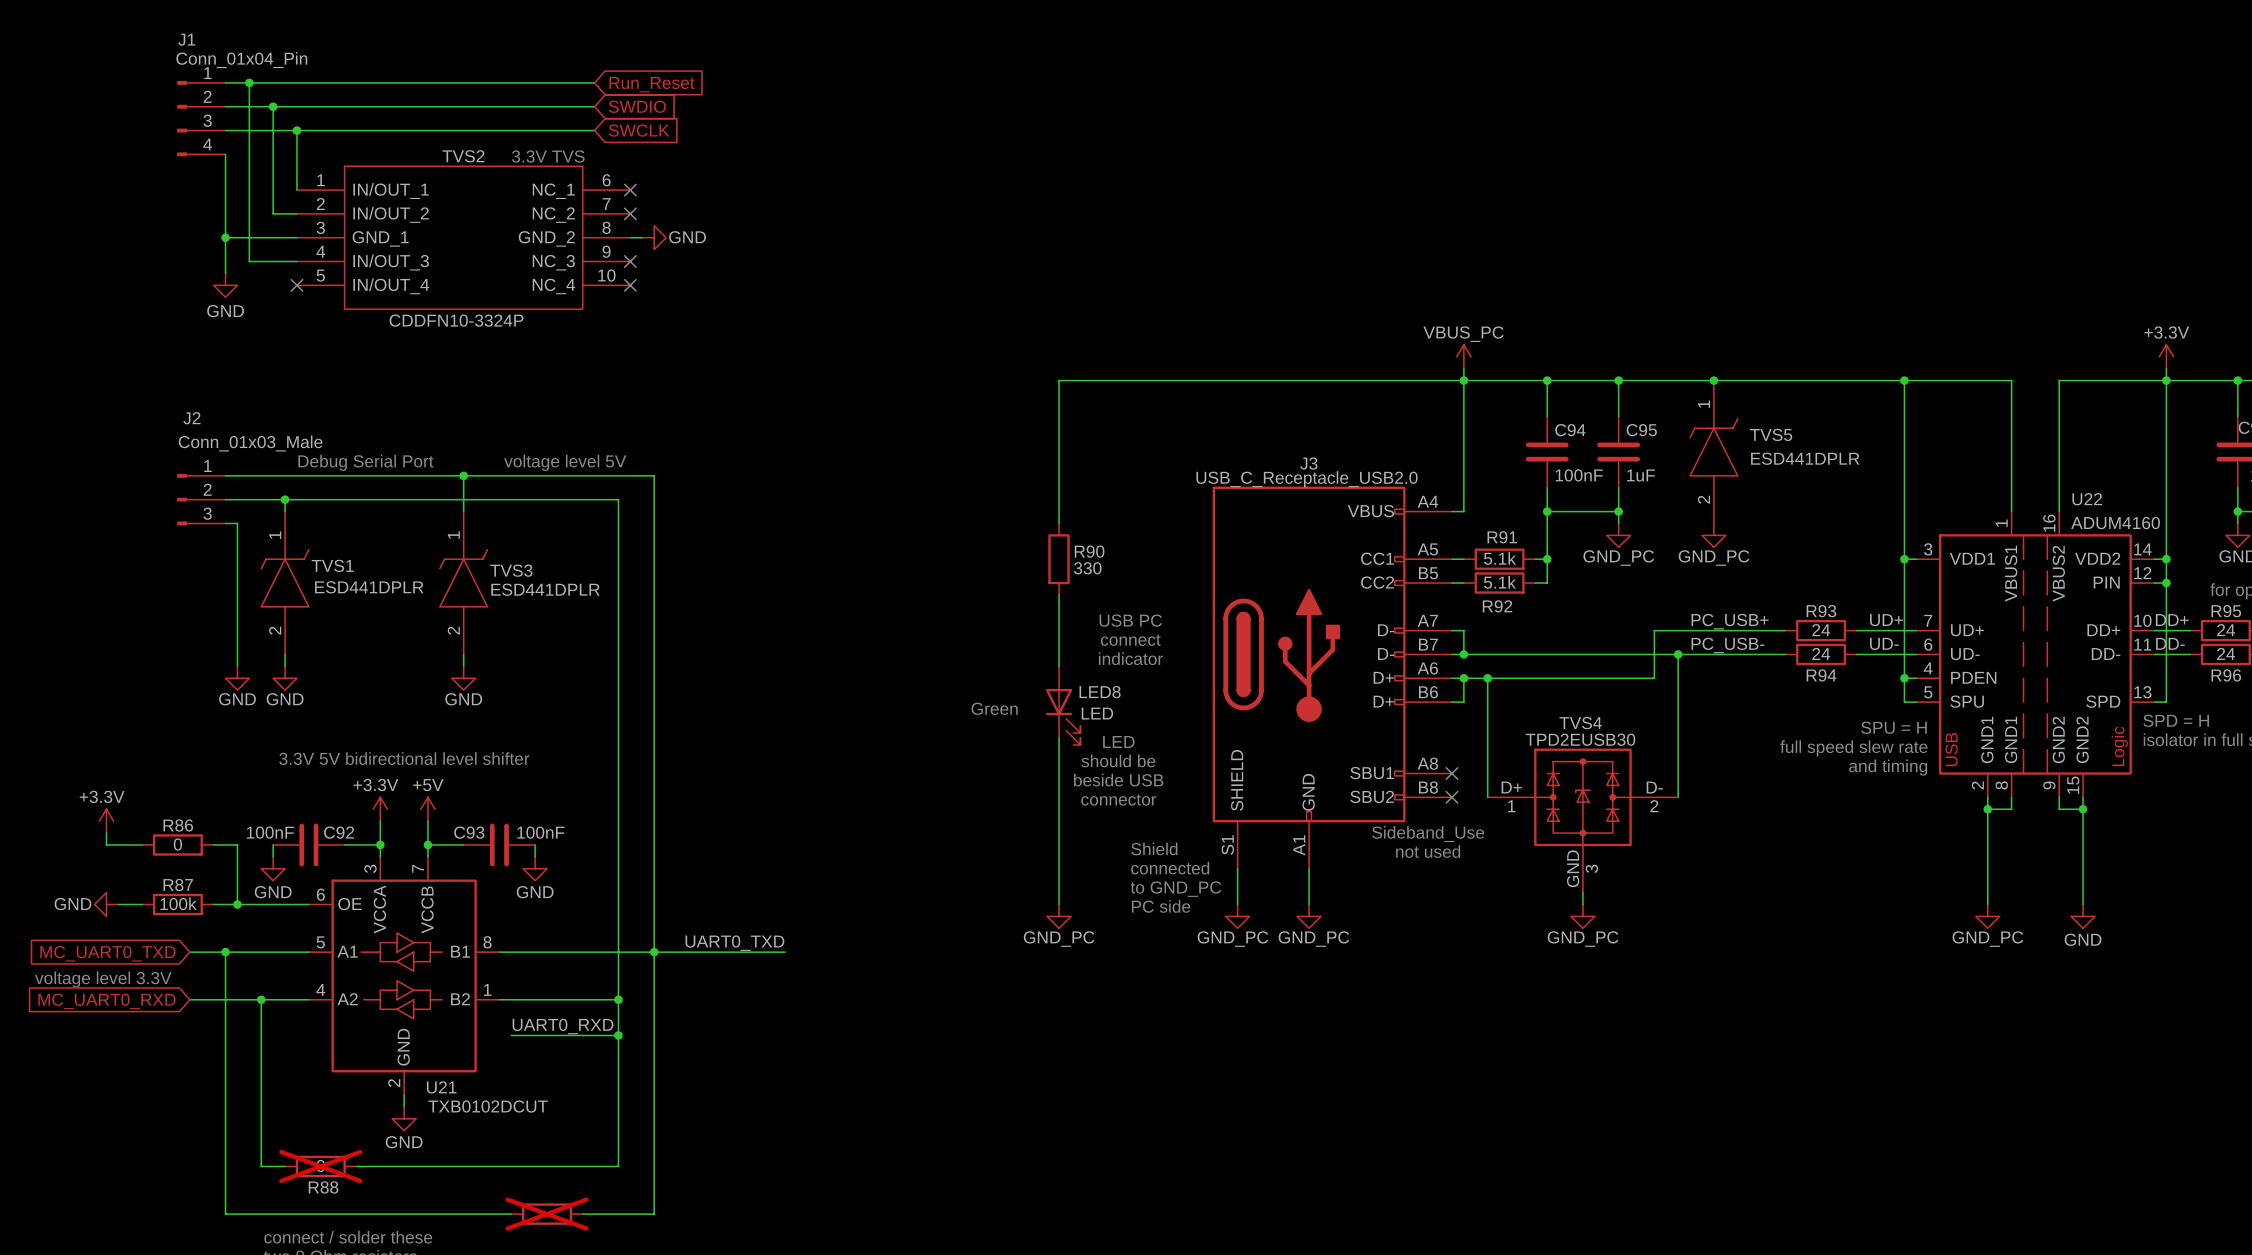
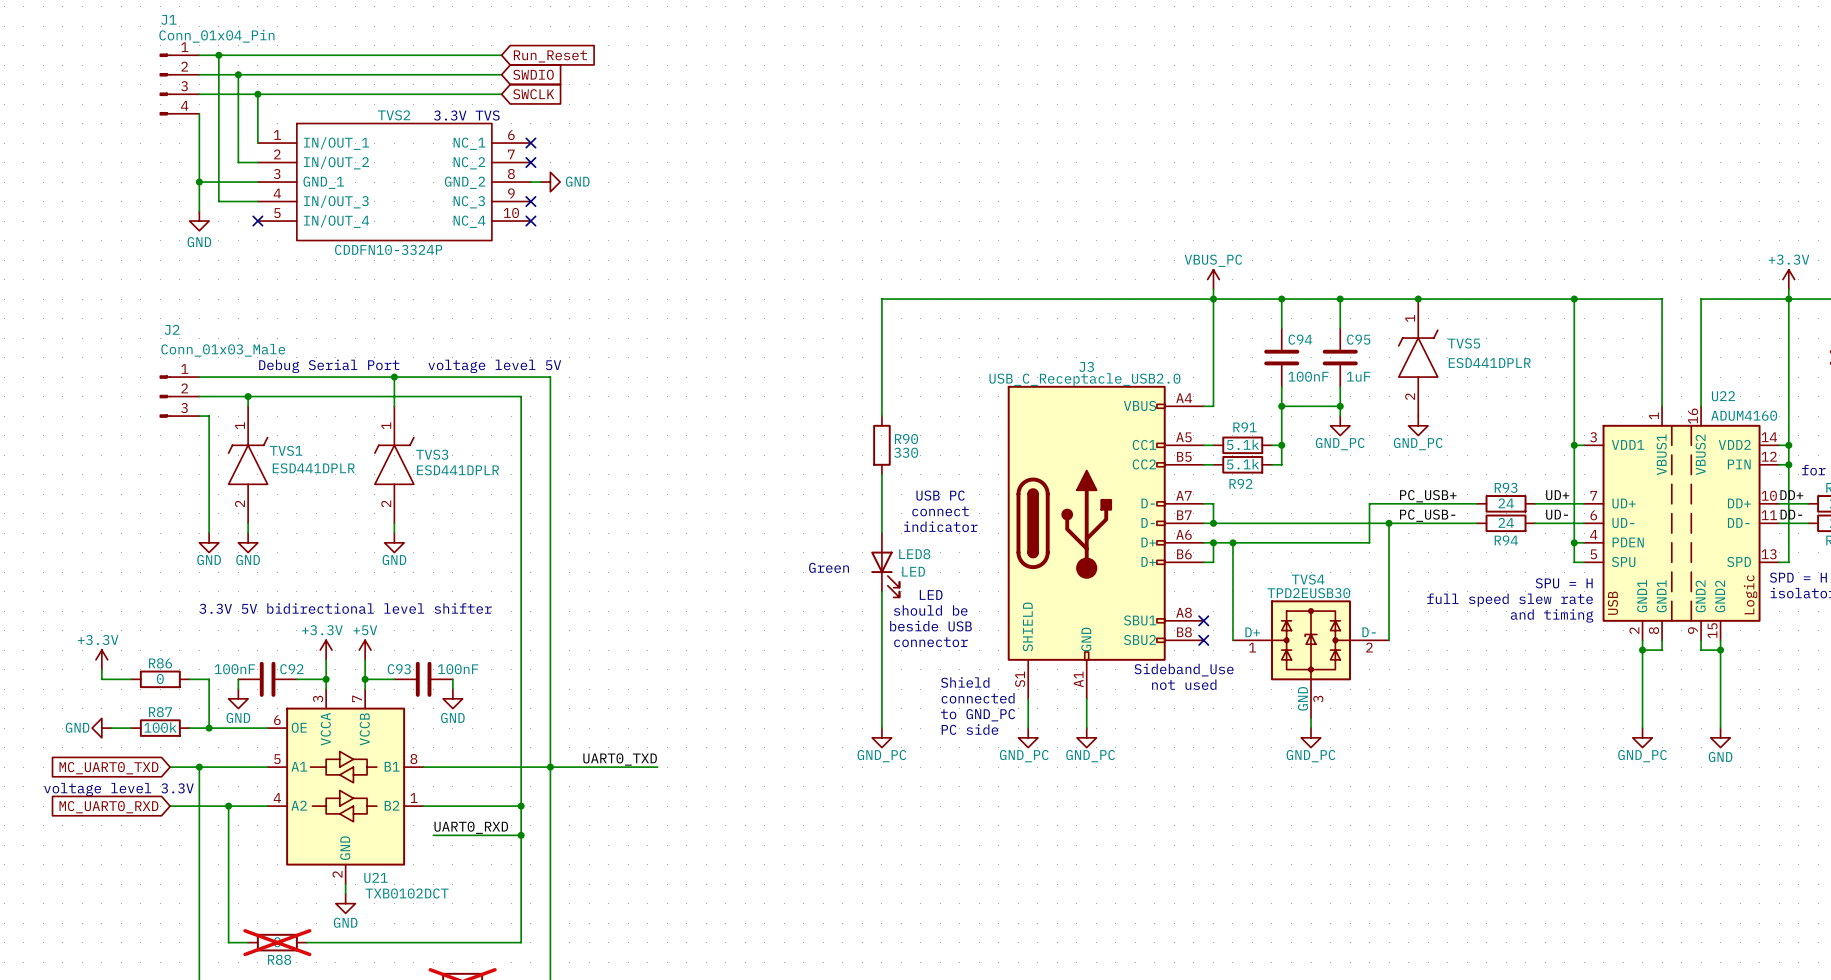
U21 value: TXB0102DCUT (488, 1106) -> TXB0102DCT (407, 893)

